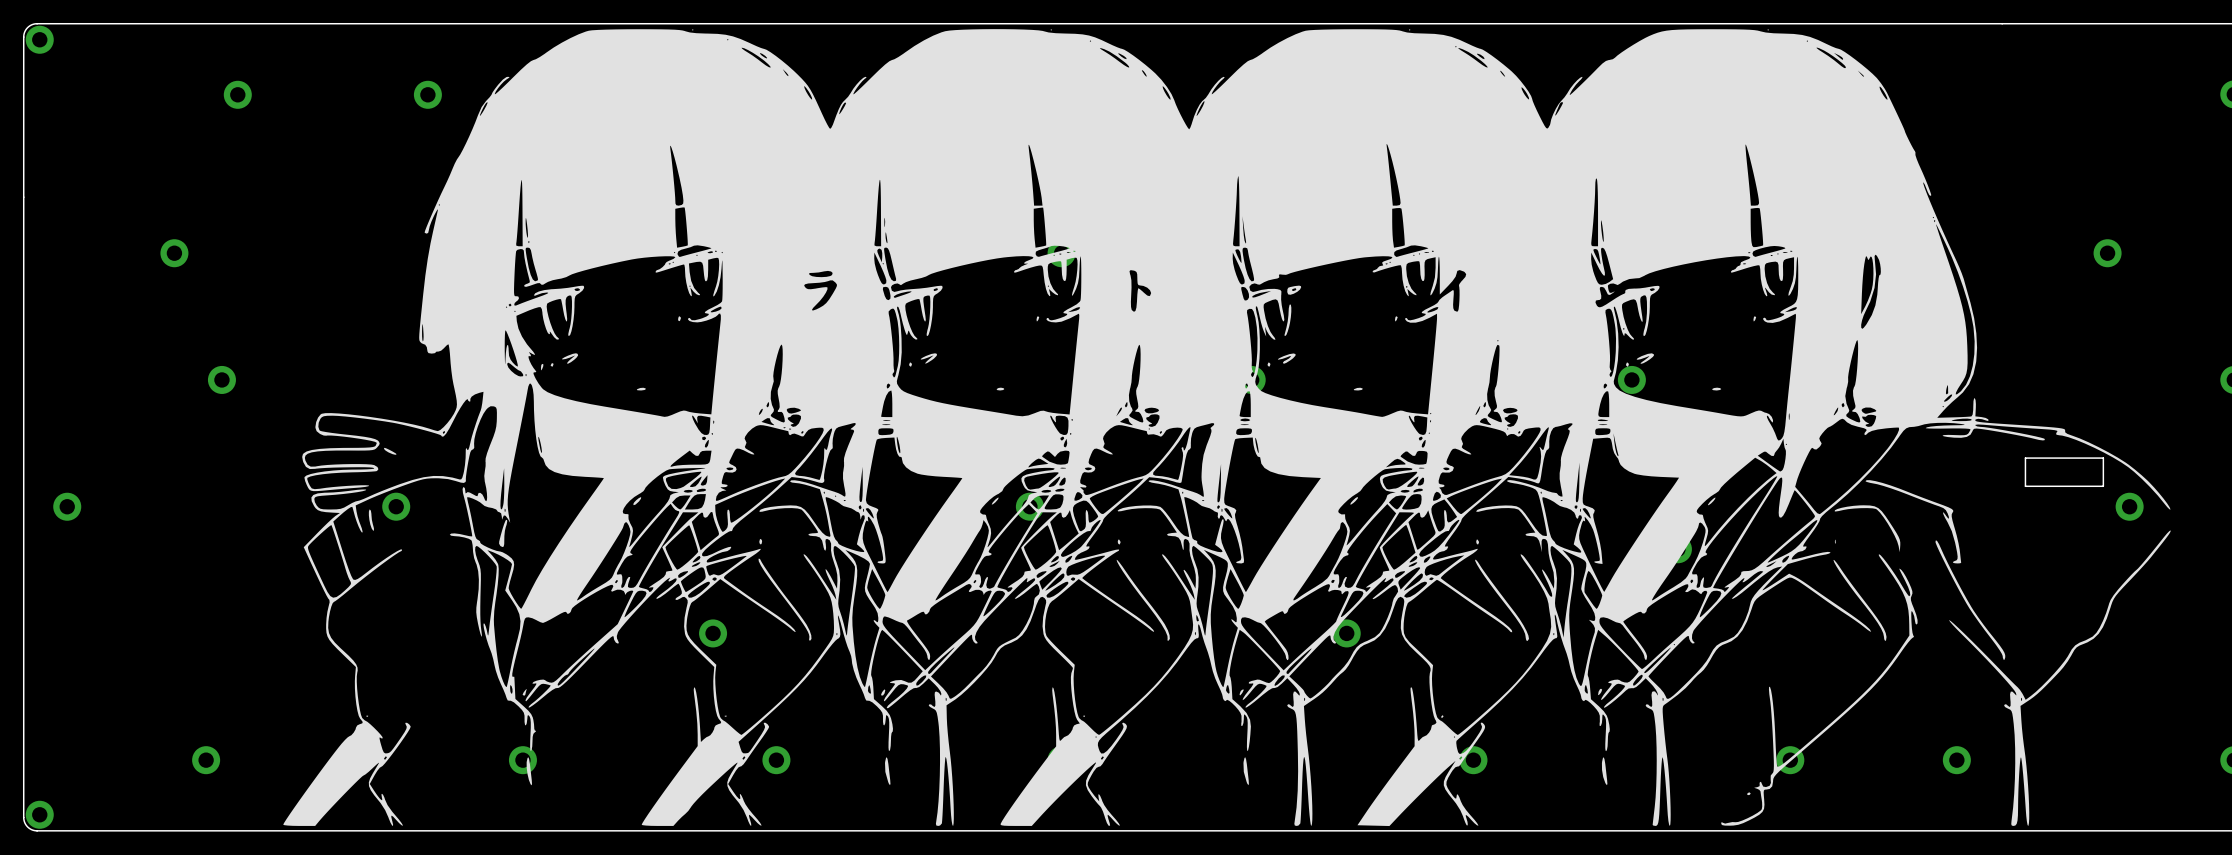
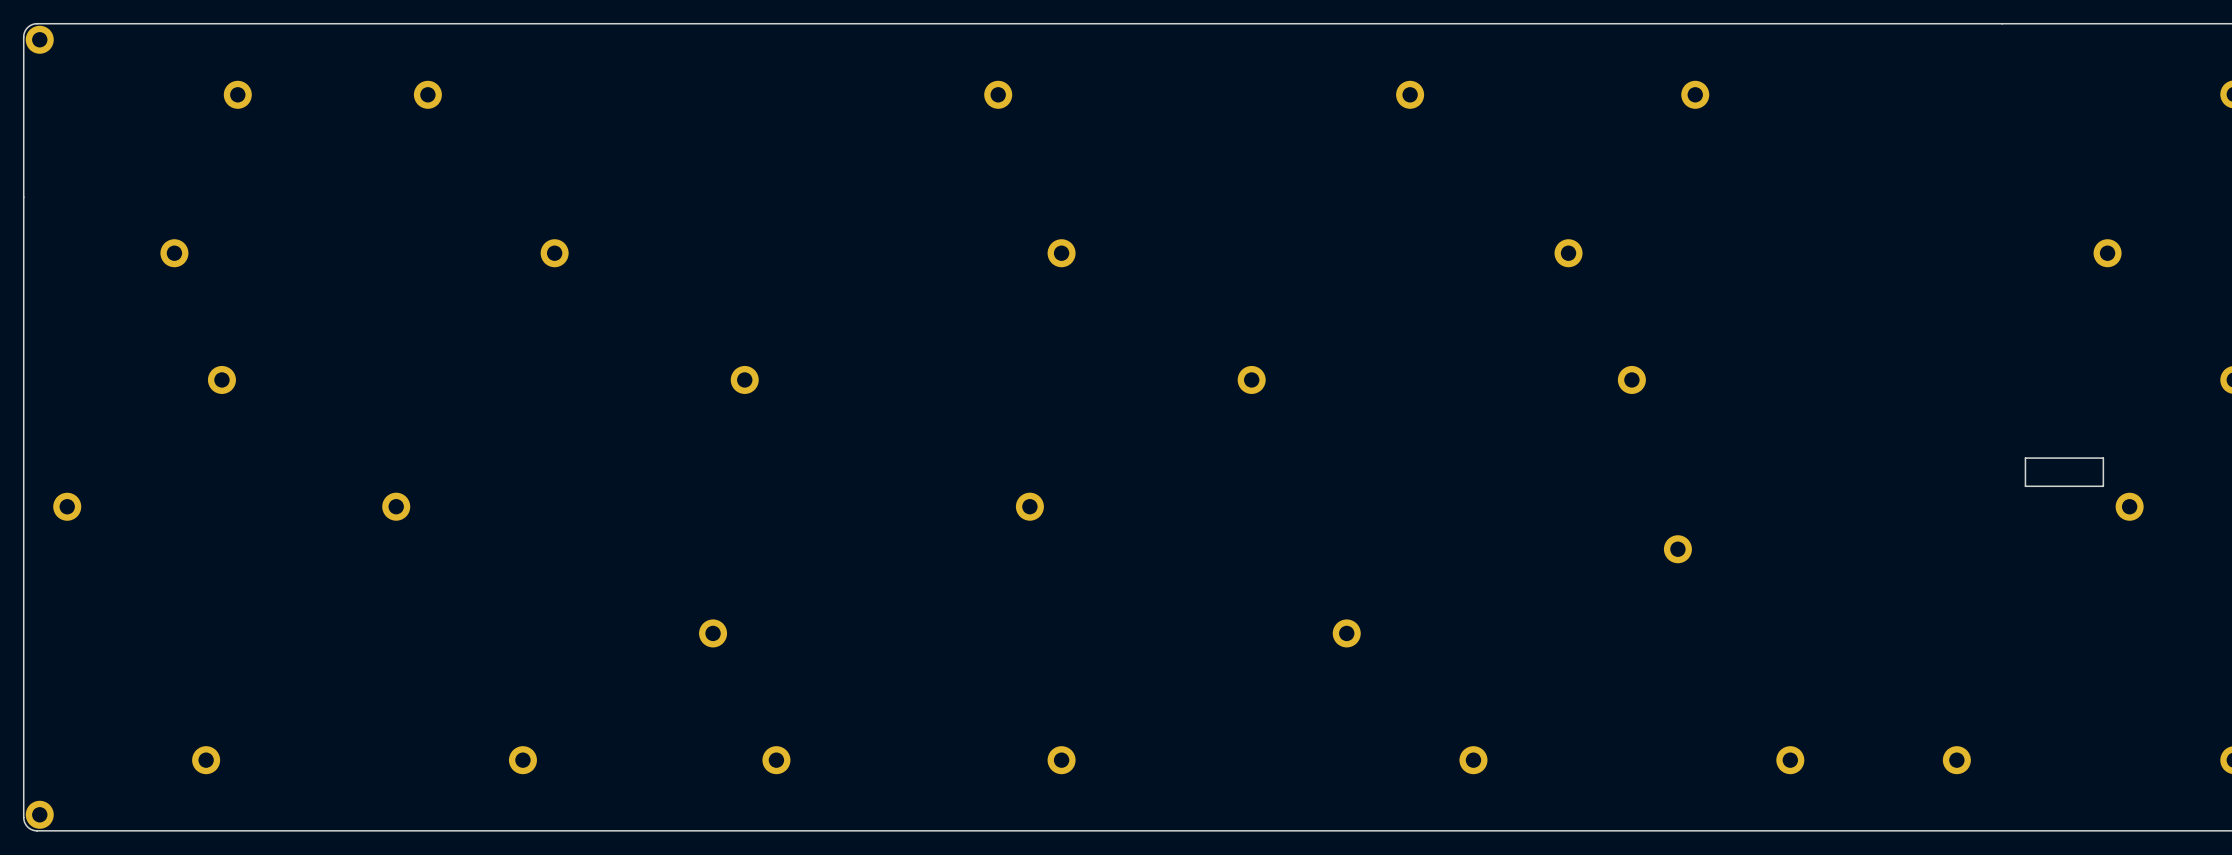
part: (1226, 427) -> none

